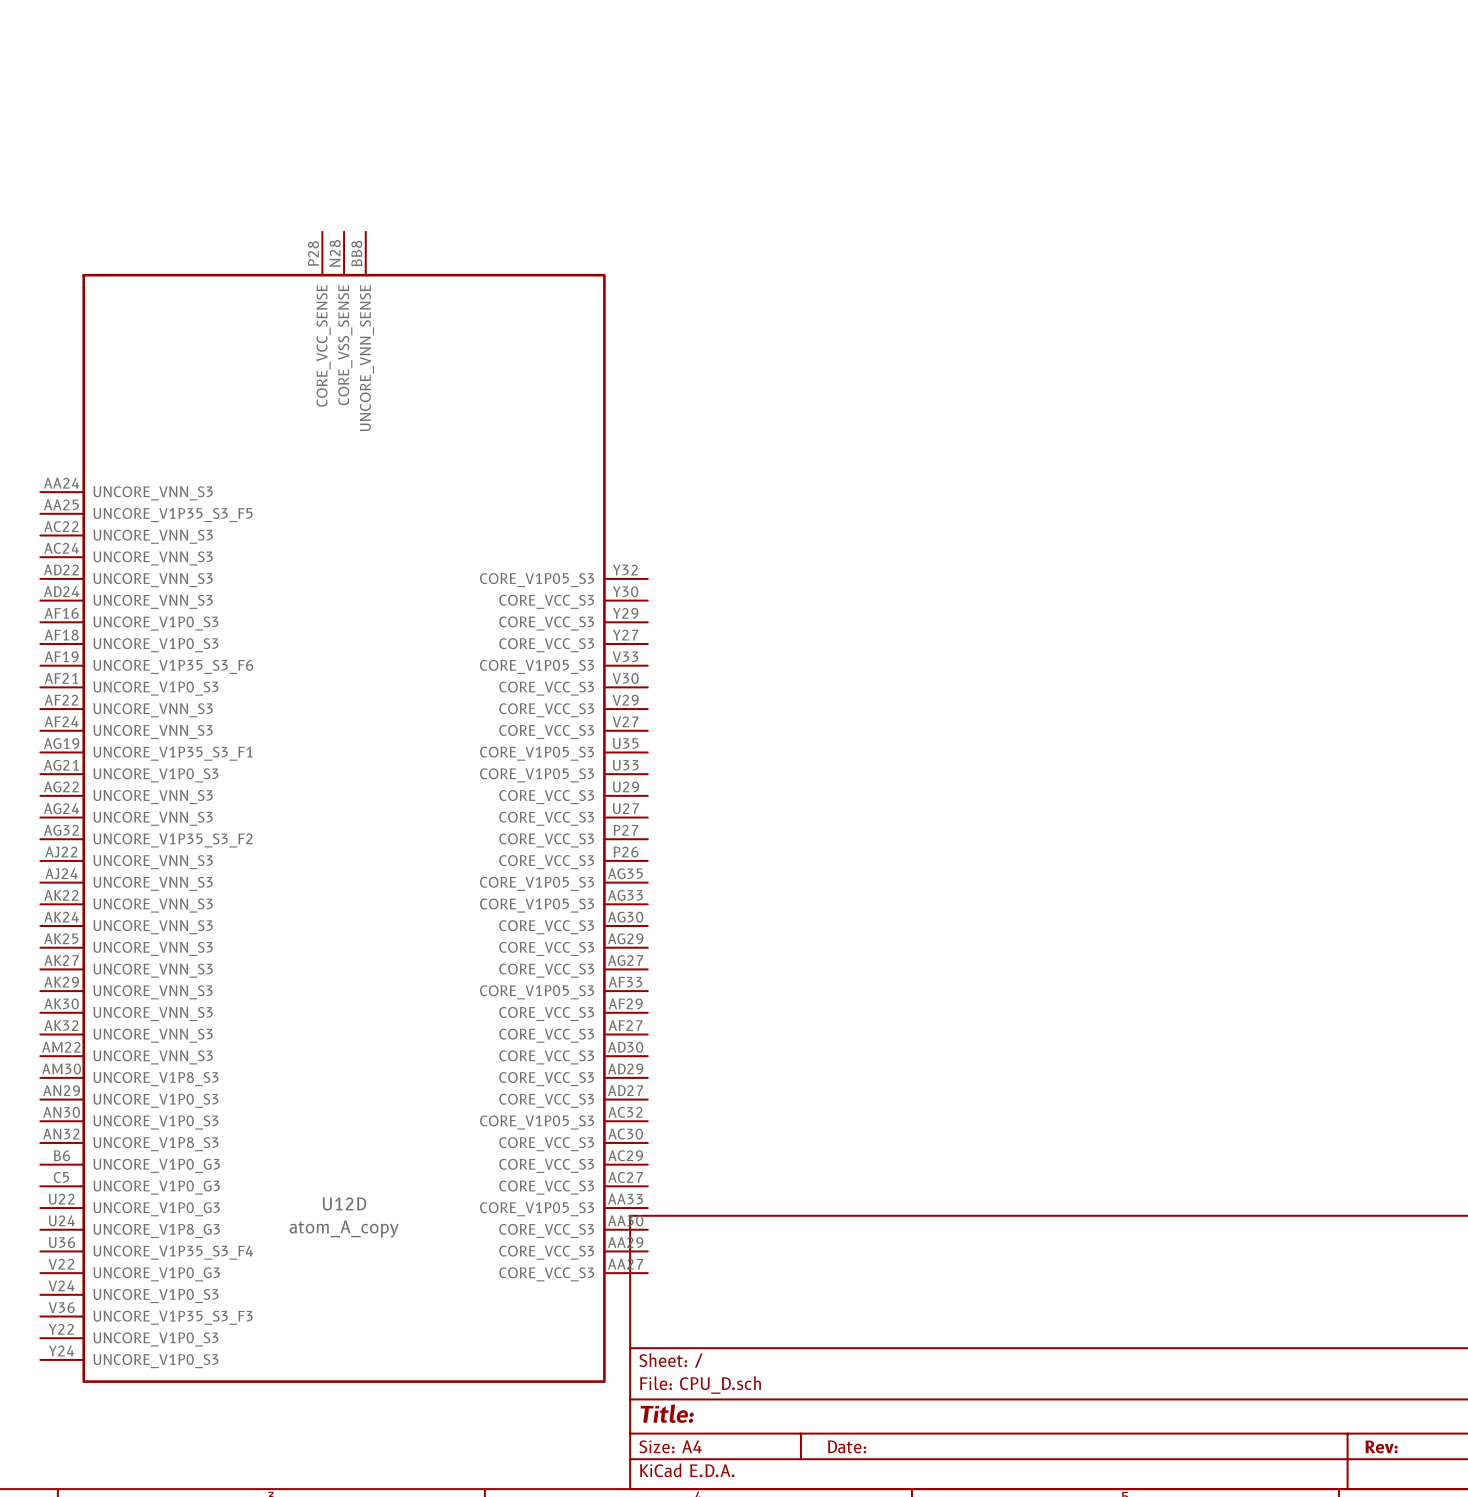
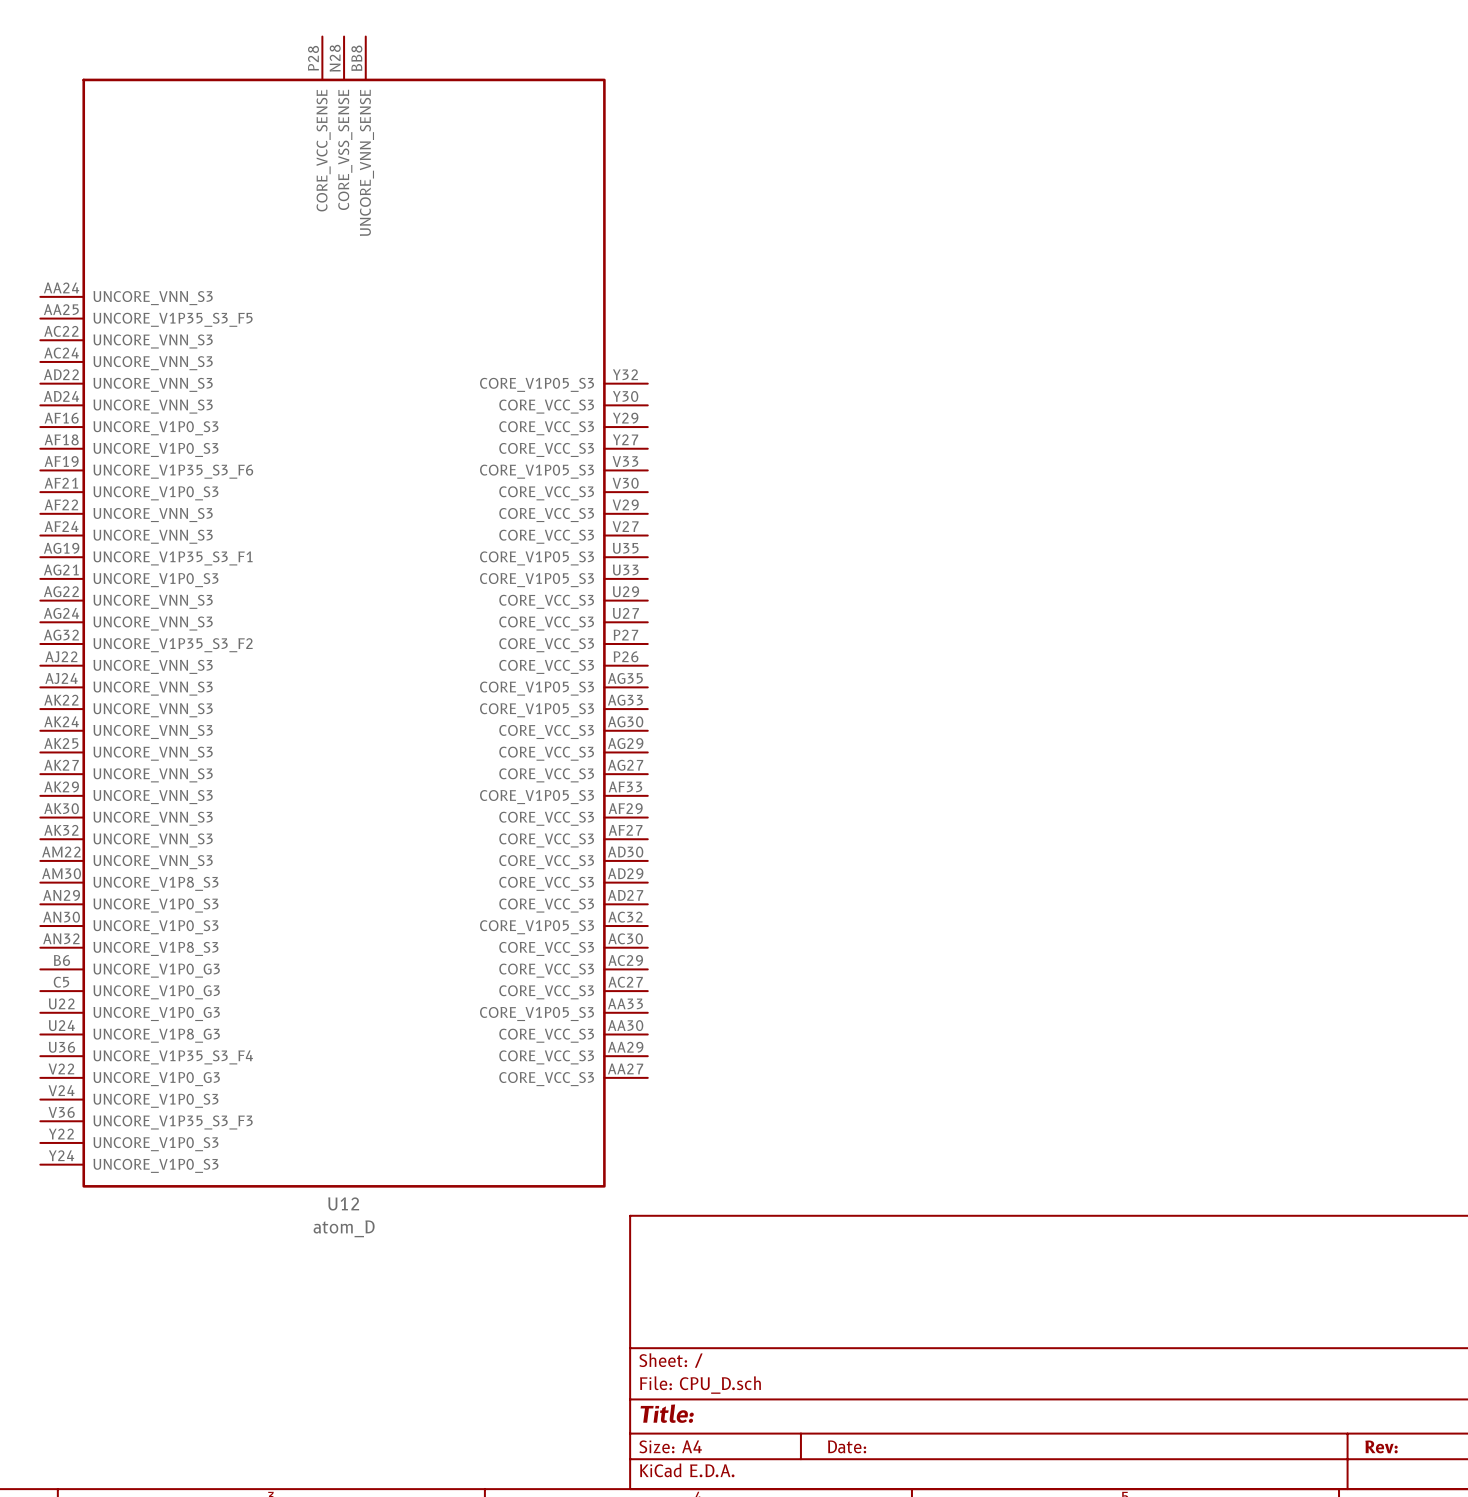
U12: none -> atom_D (344, 612)
U12D: atom_A_copy (344, 807) -> none

